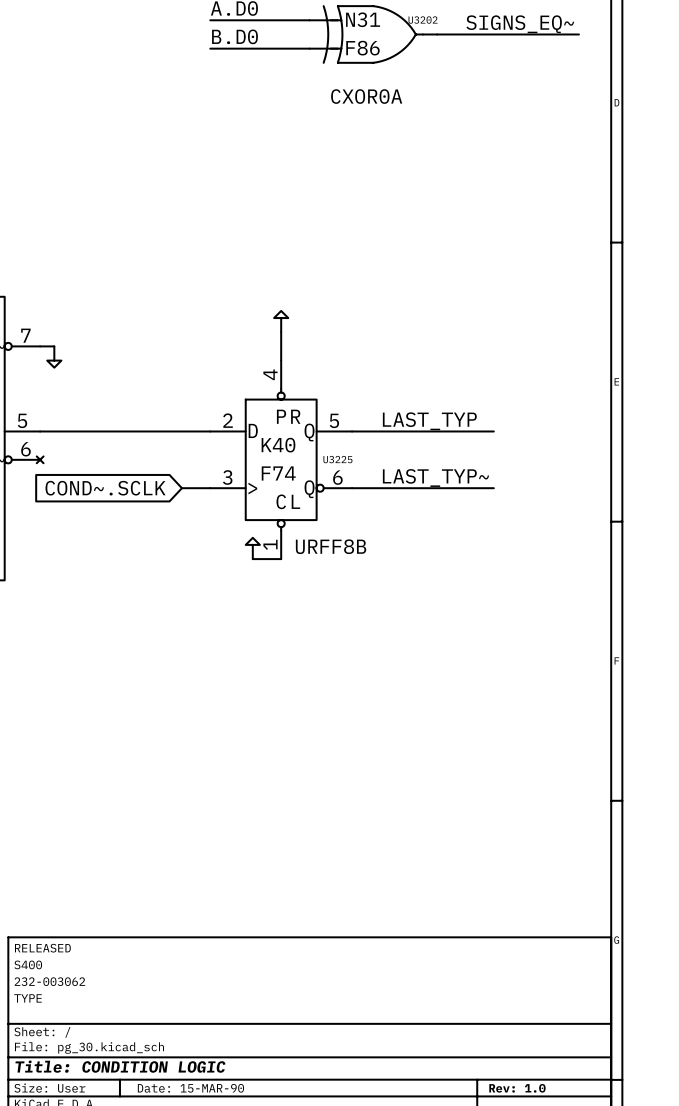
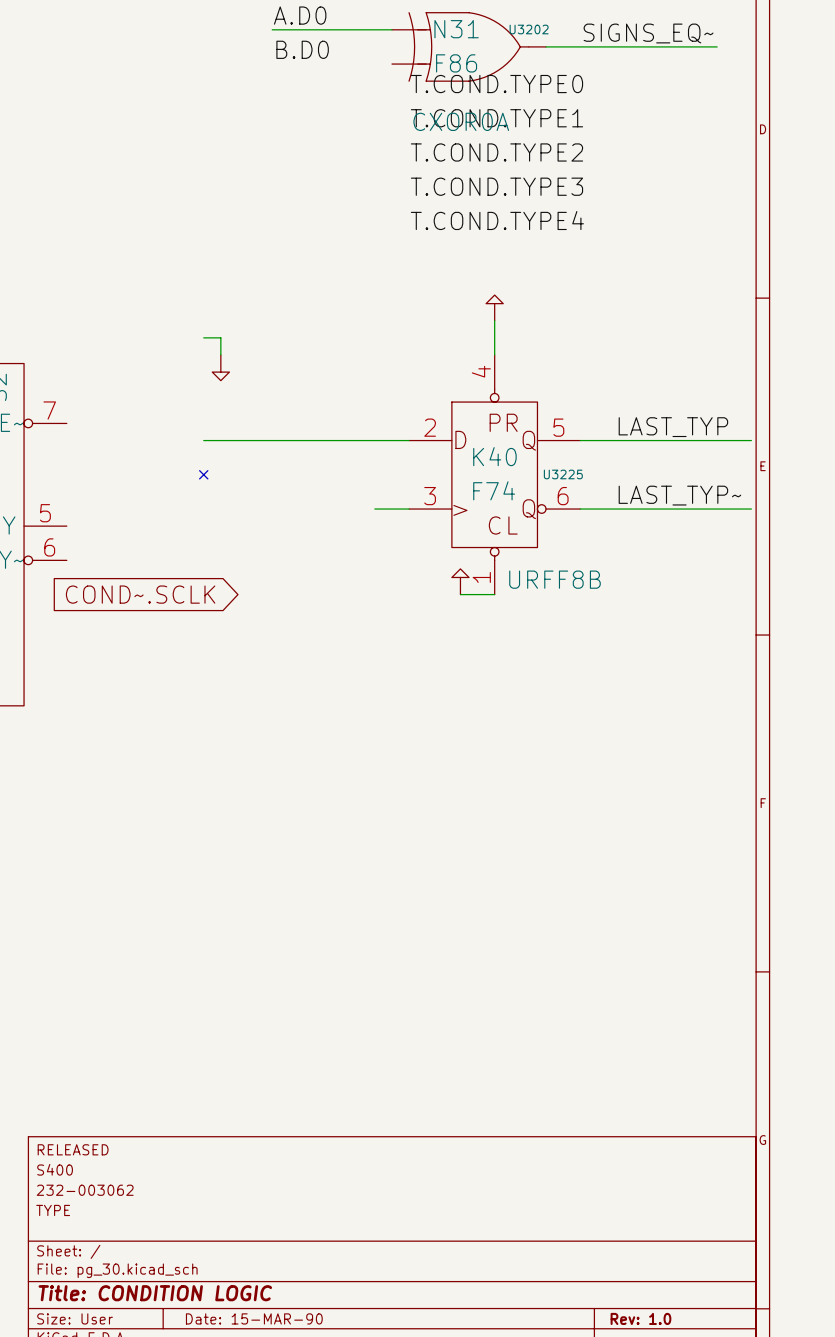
wire: (210, 48) (309, 48) -> none
label: none -> T.COND.TYPE0 (496, 84)
label: none -> T.COND.TYPE1 (496, 118)
label: none -> T.COND.TYPE2 (496, 152)
label: none -> T.COND.TYPE3 (496, 186)
label: none -> T.COND.TYPE4 (497, 220)
power symbol: none -> (494, 307)
wire: none -> (203, 337) (220, 337) (220, 354)
power symbol: none -> (220, 368)
power symbol: (281, 321) -> none
wire: (281, 332) (281, 360) -> (494, 320) (494, 354)
wire: (40, 346) (54, 346) -> none
power symbol: (54, 357) -> none
no-connect mark: none -> (203, 474)
wire: none -> (580, 509) (751, 509)
label position: LAST_TYP (429, 421) -> LAST_TYP (673, 427)
wire: (40, 431) (210, 431) -> (203, 440) (409, 440)
wire: (352, 431) (493, 431) -> (580, 440) (751, 440)
no-connect mark: (40, 459) -> none
U3225 position: (281, 459) -> (494, 474)
power symbol: none -> (460, 581)
label position: LAST_TYP~ (435, 477) -> LAST_TYP~ (679, 495)
wire: (181, 488) (210, 488) -> (374, 509) (409, 509)
wire: (352, 488) (366, 488) -> none
wire: (394, 488) (493, 488) -> none
power symbol: (252, 548) -> none
wire: (252, 559) (281, 559) -> none

